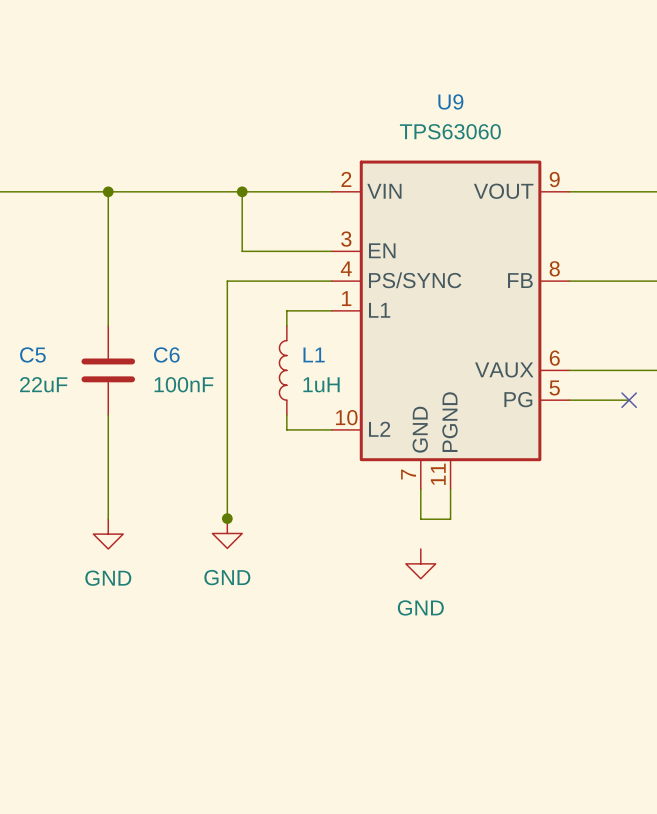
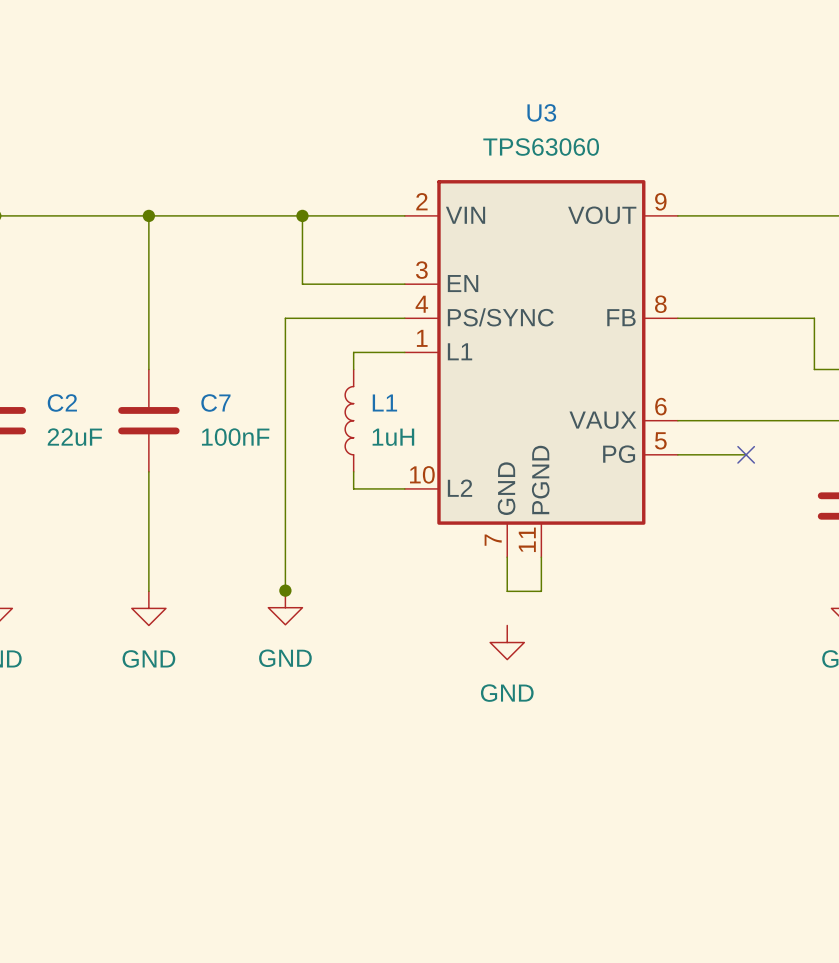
U9 name: U9 (450, 101) -> U3 (541, 112)
C5 name: C5 (32, 354) -> C2 (62, 402)
C6 name: C6 (166, 354) -> C7 (215, 402)

